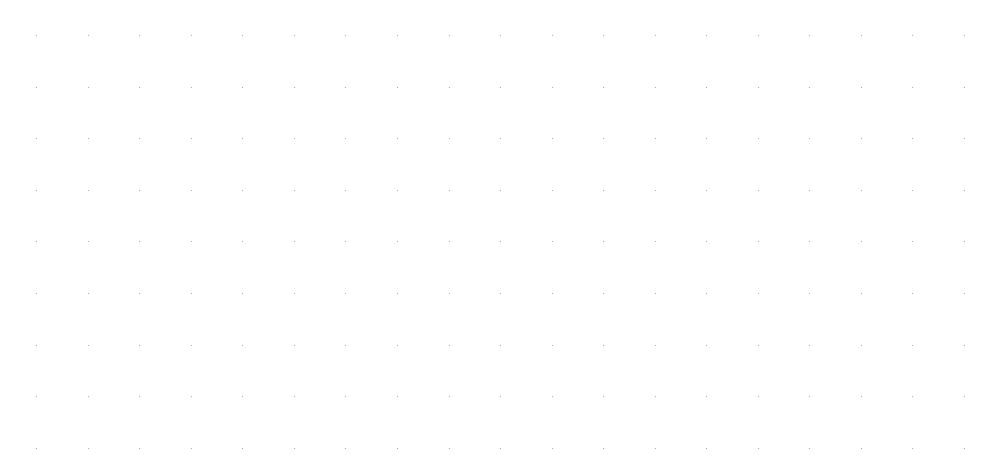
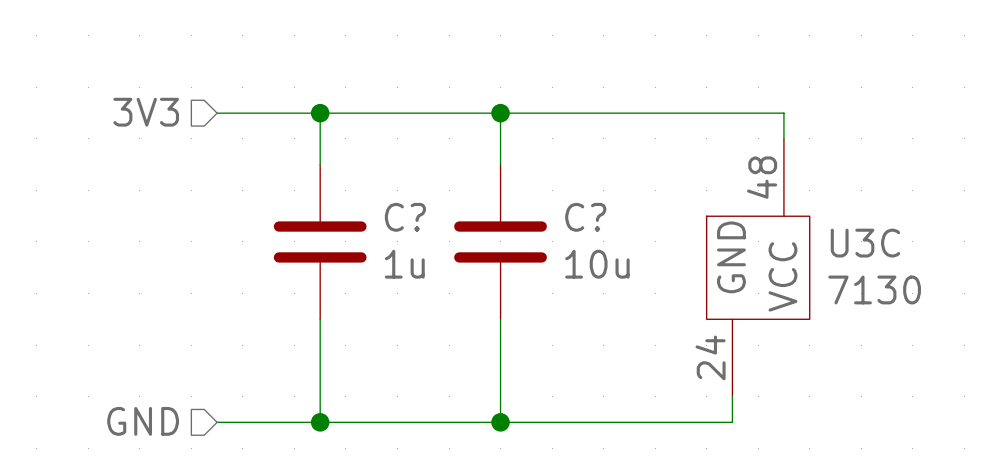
hierarchical label: none -> 3V3 (146, 112)
wire: none -> (217, 113) (783, 113) (783, 138)
wire: none -> (320, 113) (320, 164)
junction: none -> (320, 113)
wire: none -> (500, 113) (500, 164)
junction: none -> (500, 113)
C?: none -> 1u (320, 241)
C?: none -> 10u (500, 241)
U3C: none -> 7130 (758, 267)
wire: none -> (320, 319) (320, 422)
wire: none -> (500, 319) (500, 422)
wire: none -> (732, 396) (732, 422) (217, 422)
hierarchical label: none -> GND (143, 421)
junction: none -> (320, 422)
junction: none -> (500, 422)

